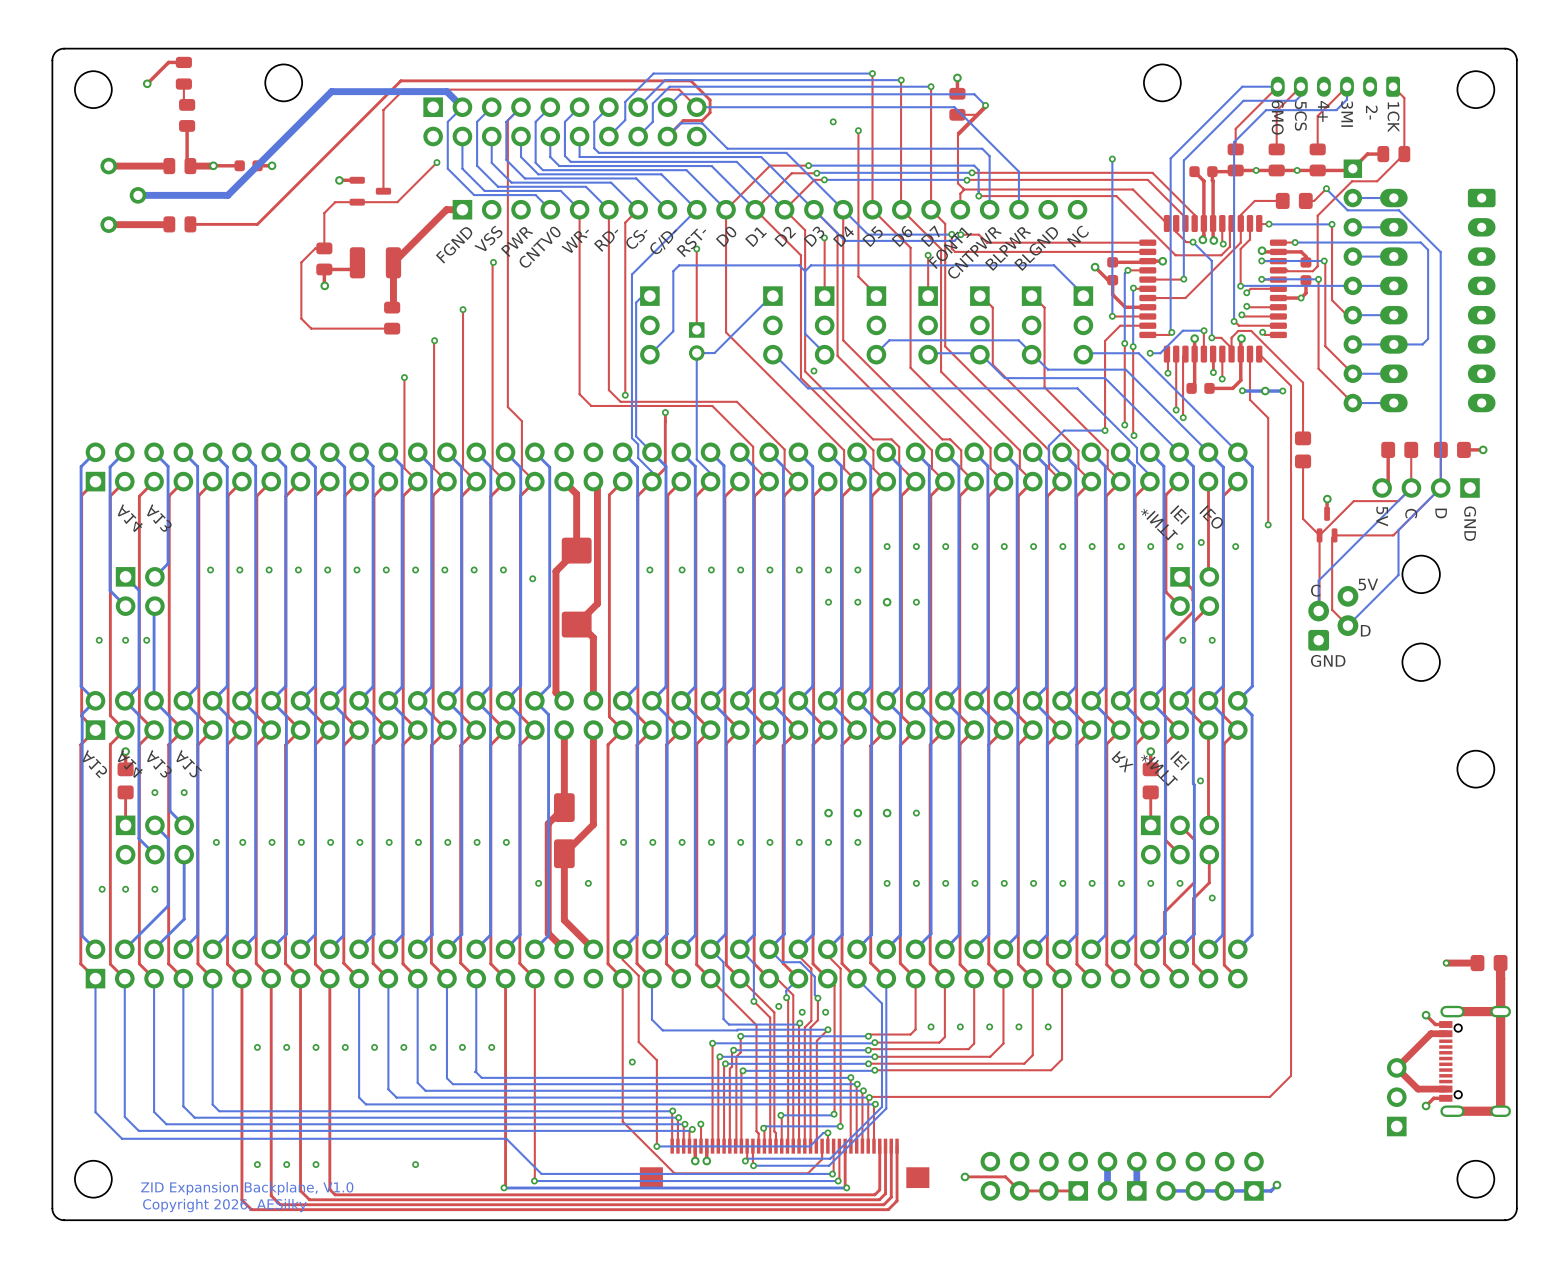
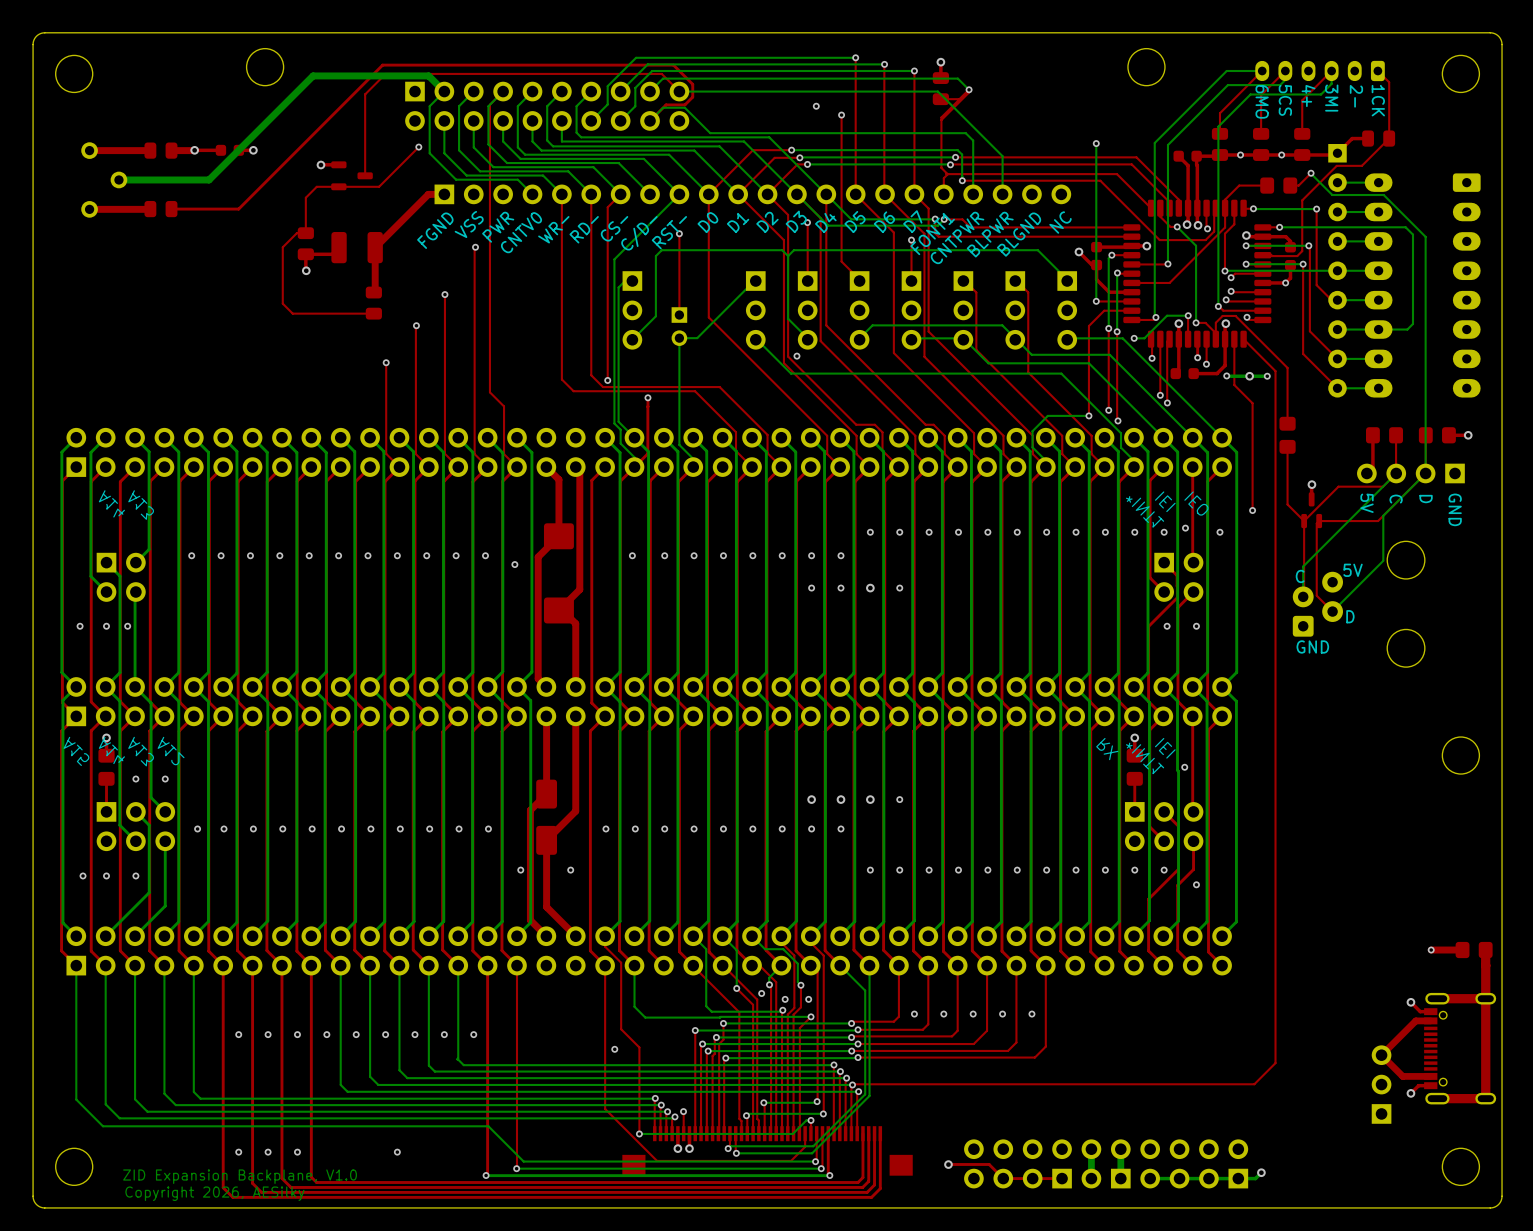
top track: (183, 62) (168, 62) (147, 83) -> none
part: (183, 73) -> none
via: (147, 83) -> none
top track: (183, 84) (183, 101) (187, 104) -> none
part: (187, 115) -> none
top track: (187, 125) (187, 162) (190, 166) -> none

